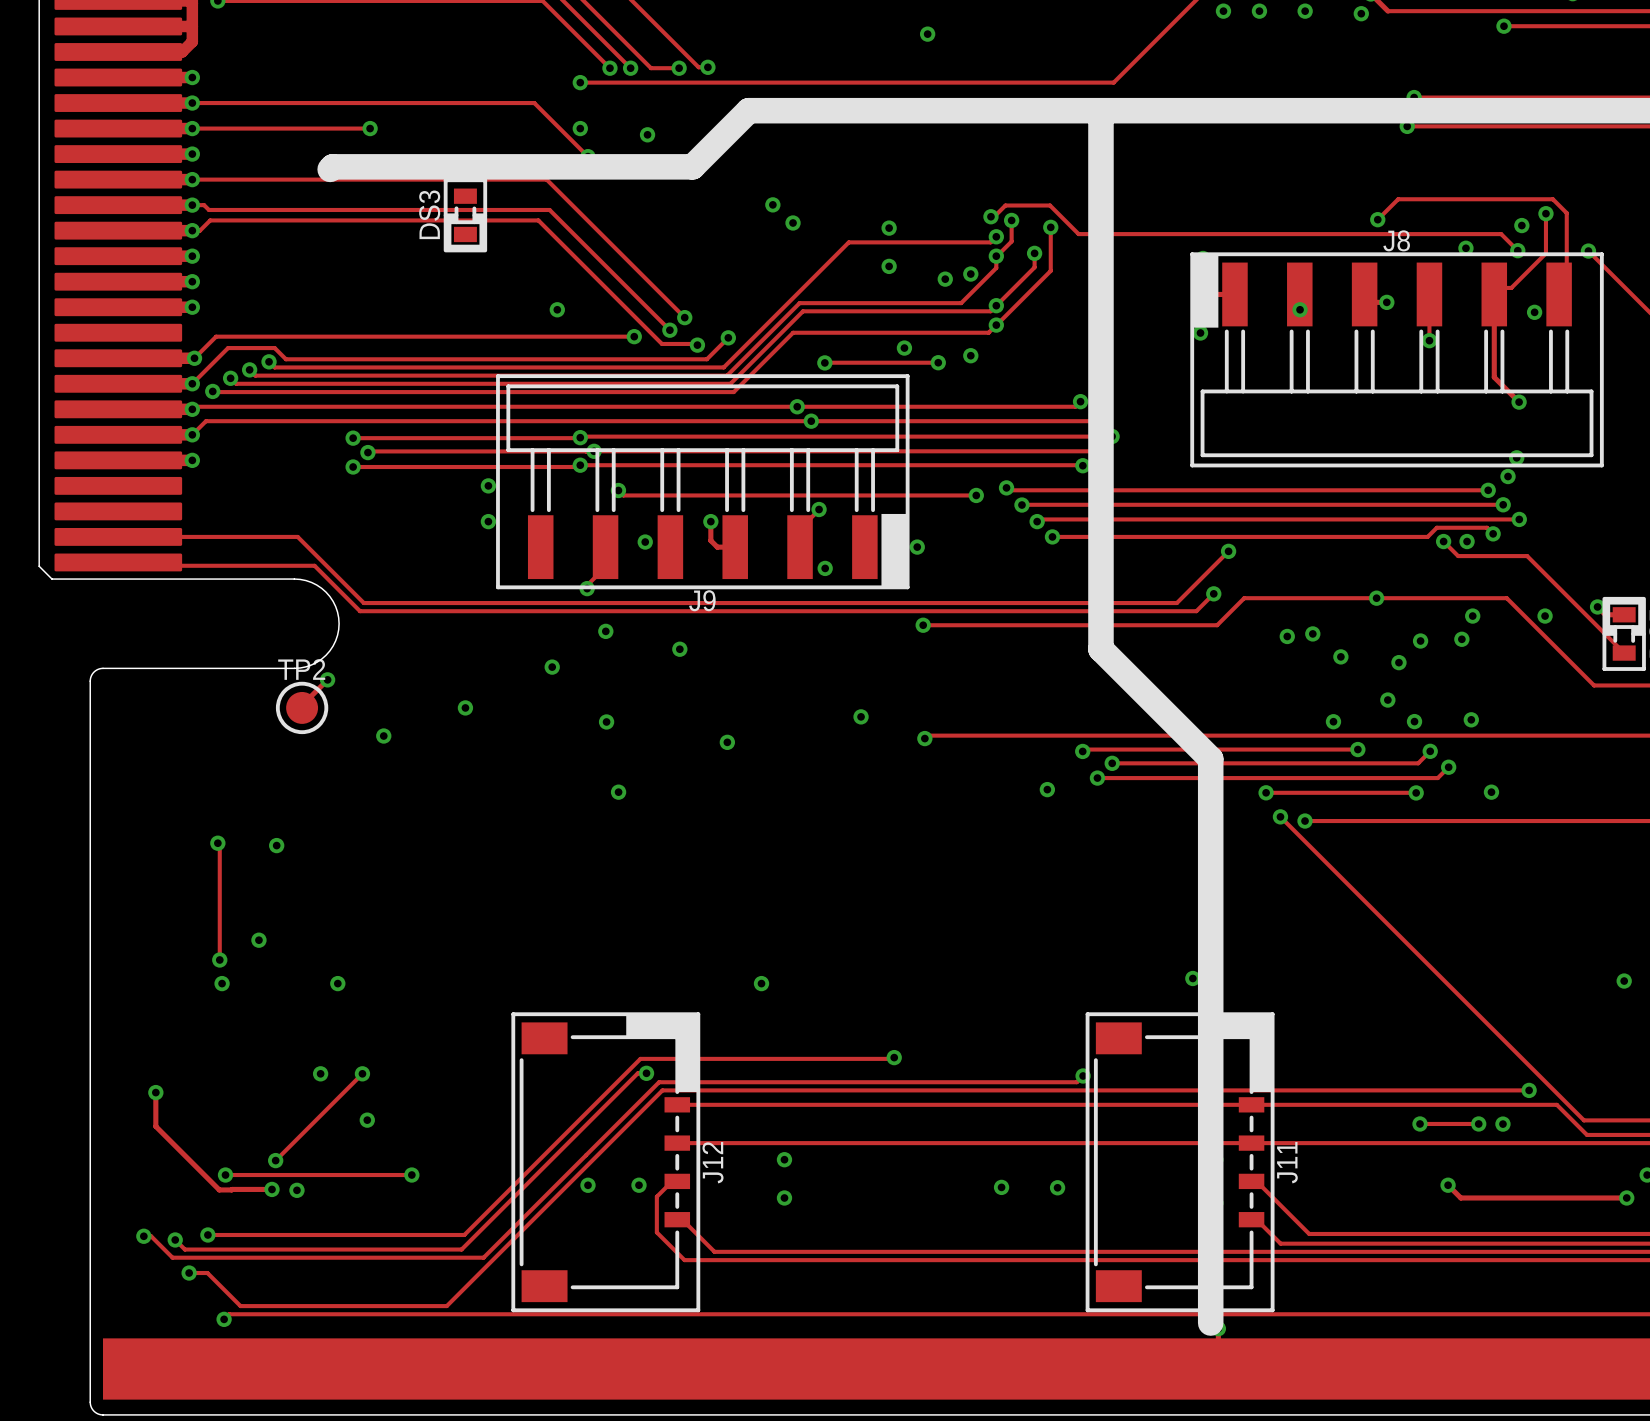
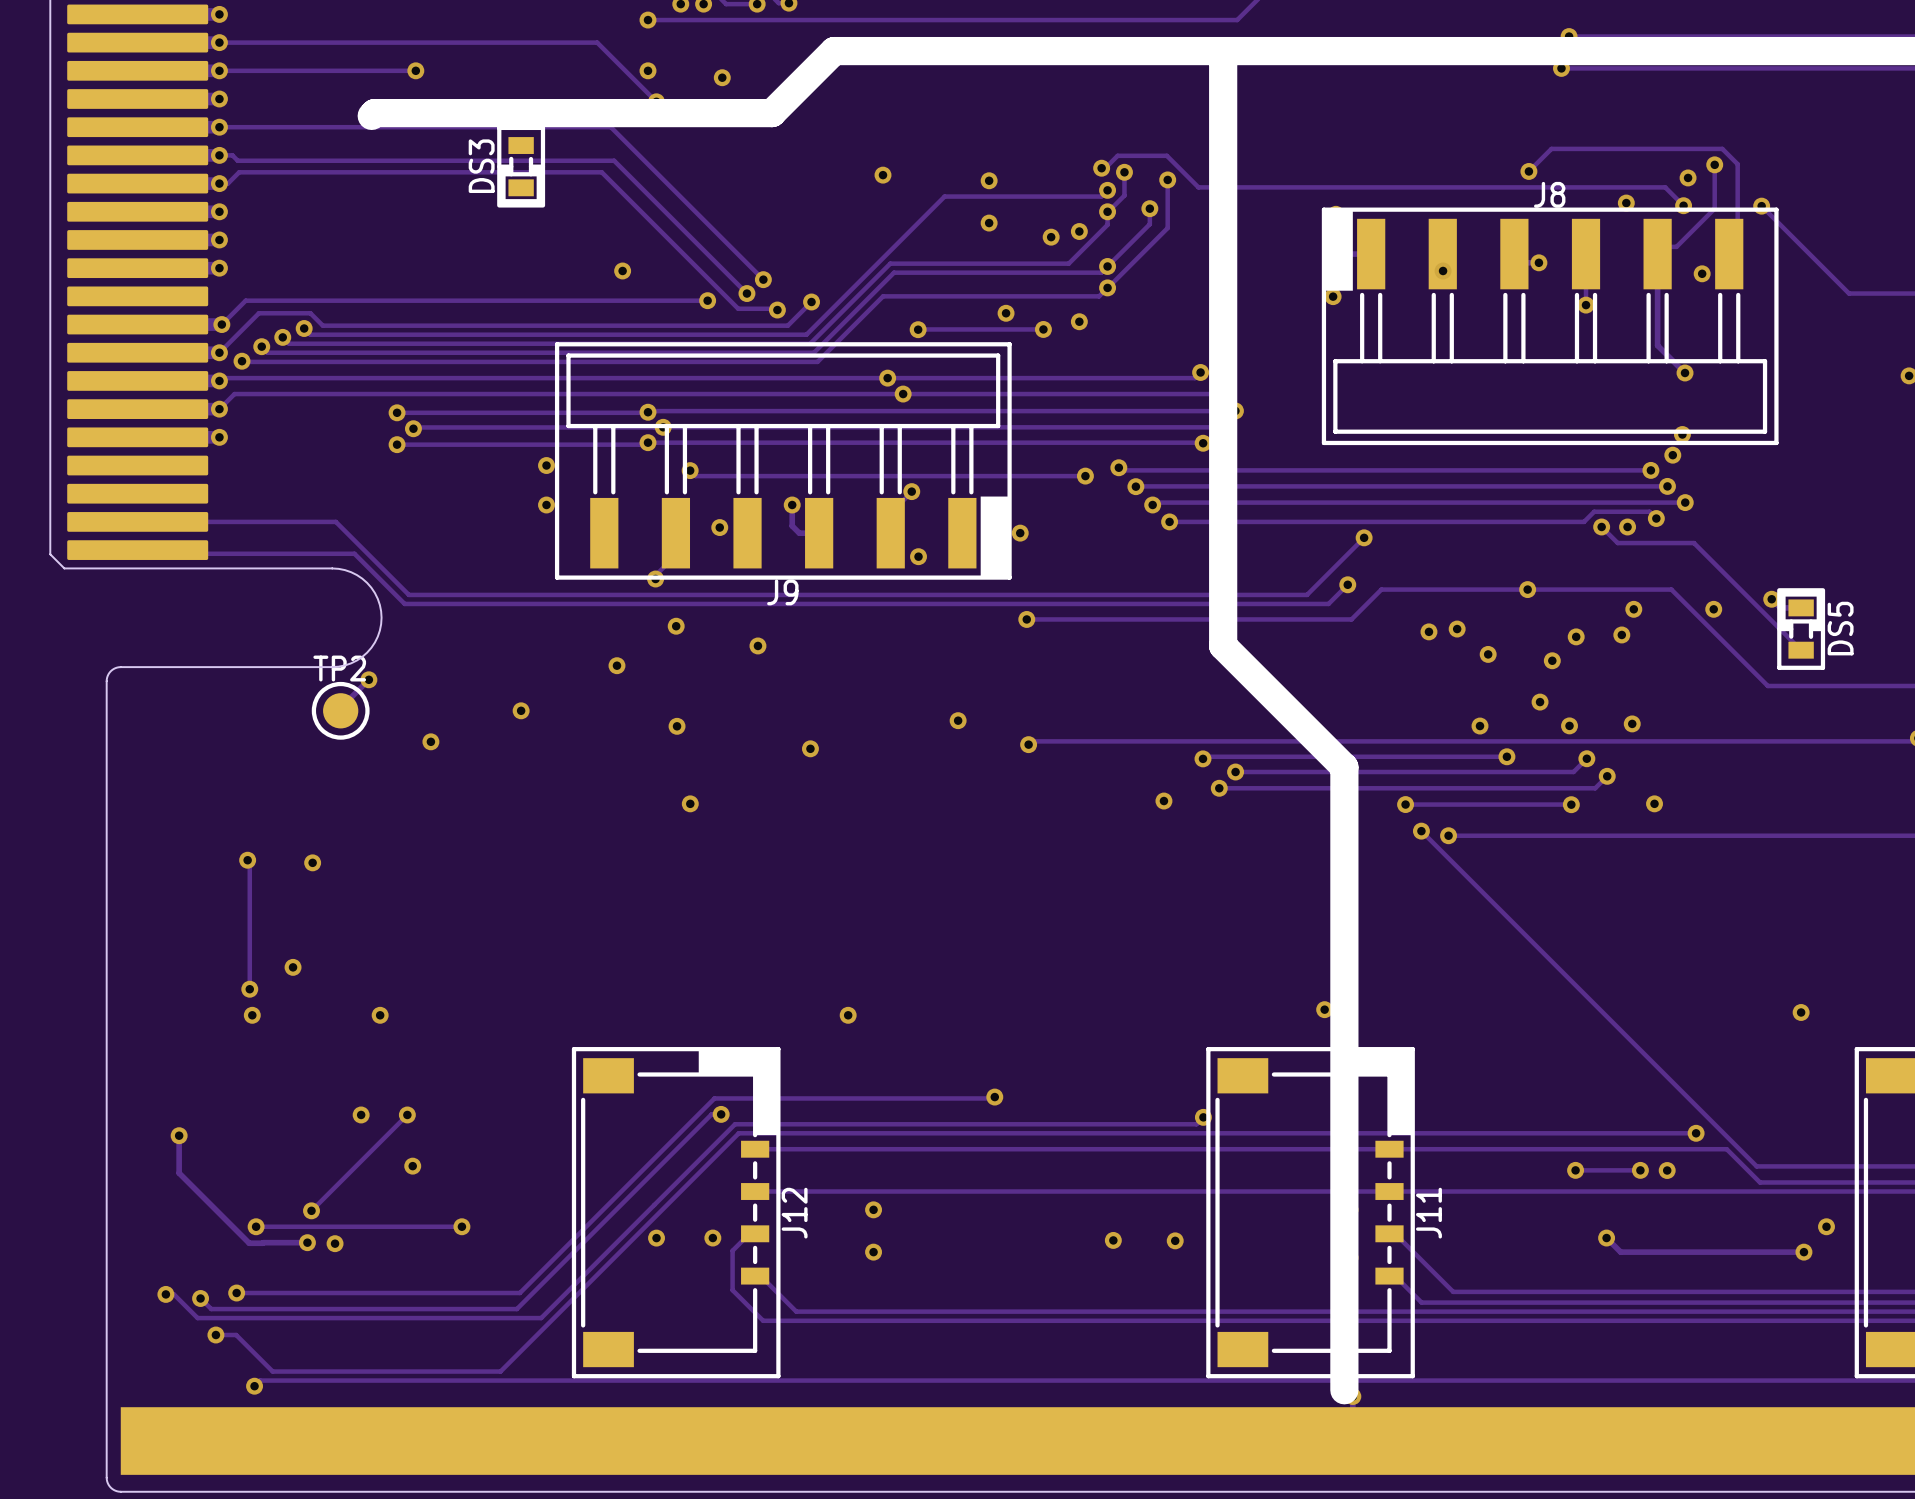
via: (772, 204) -> none

